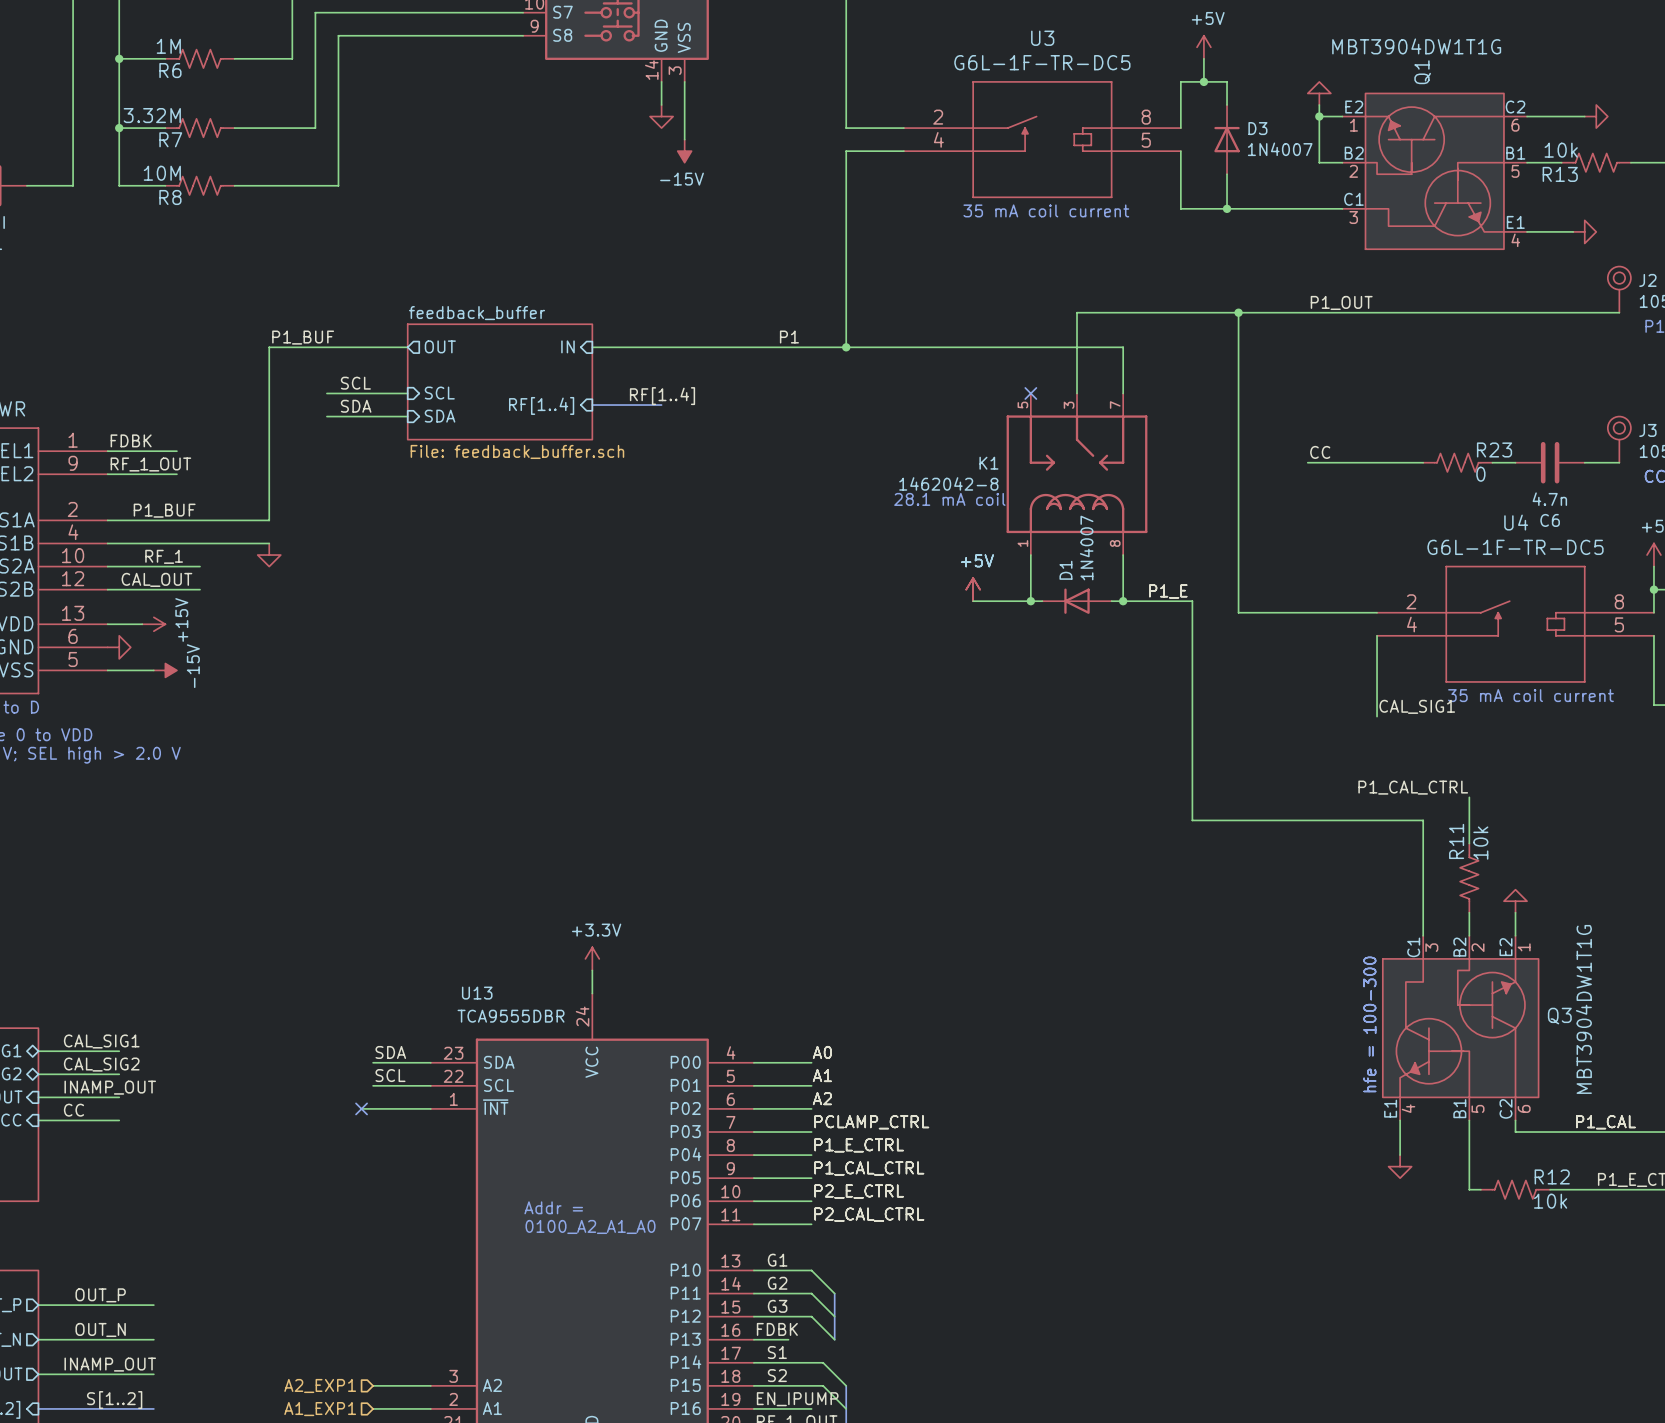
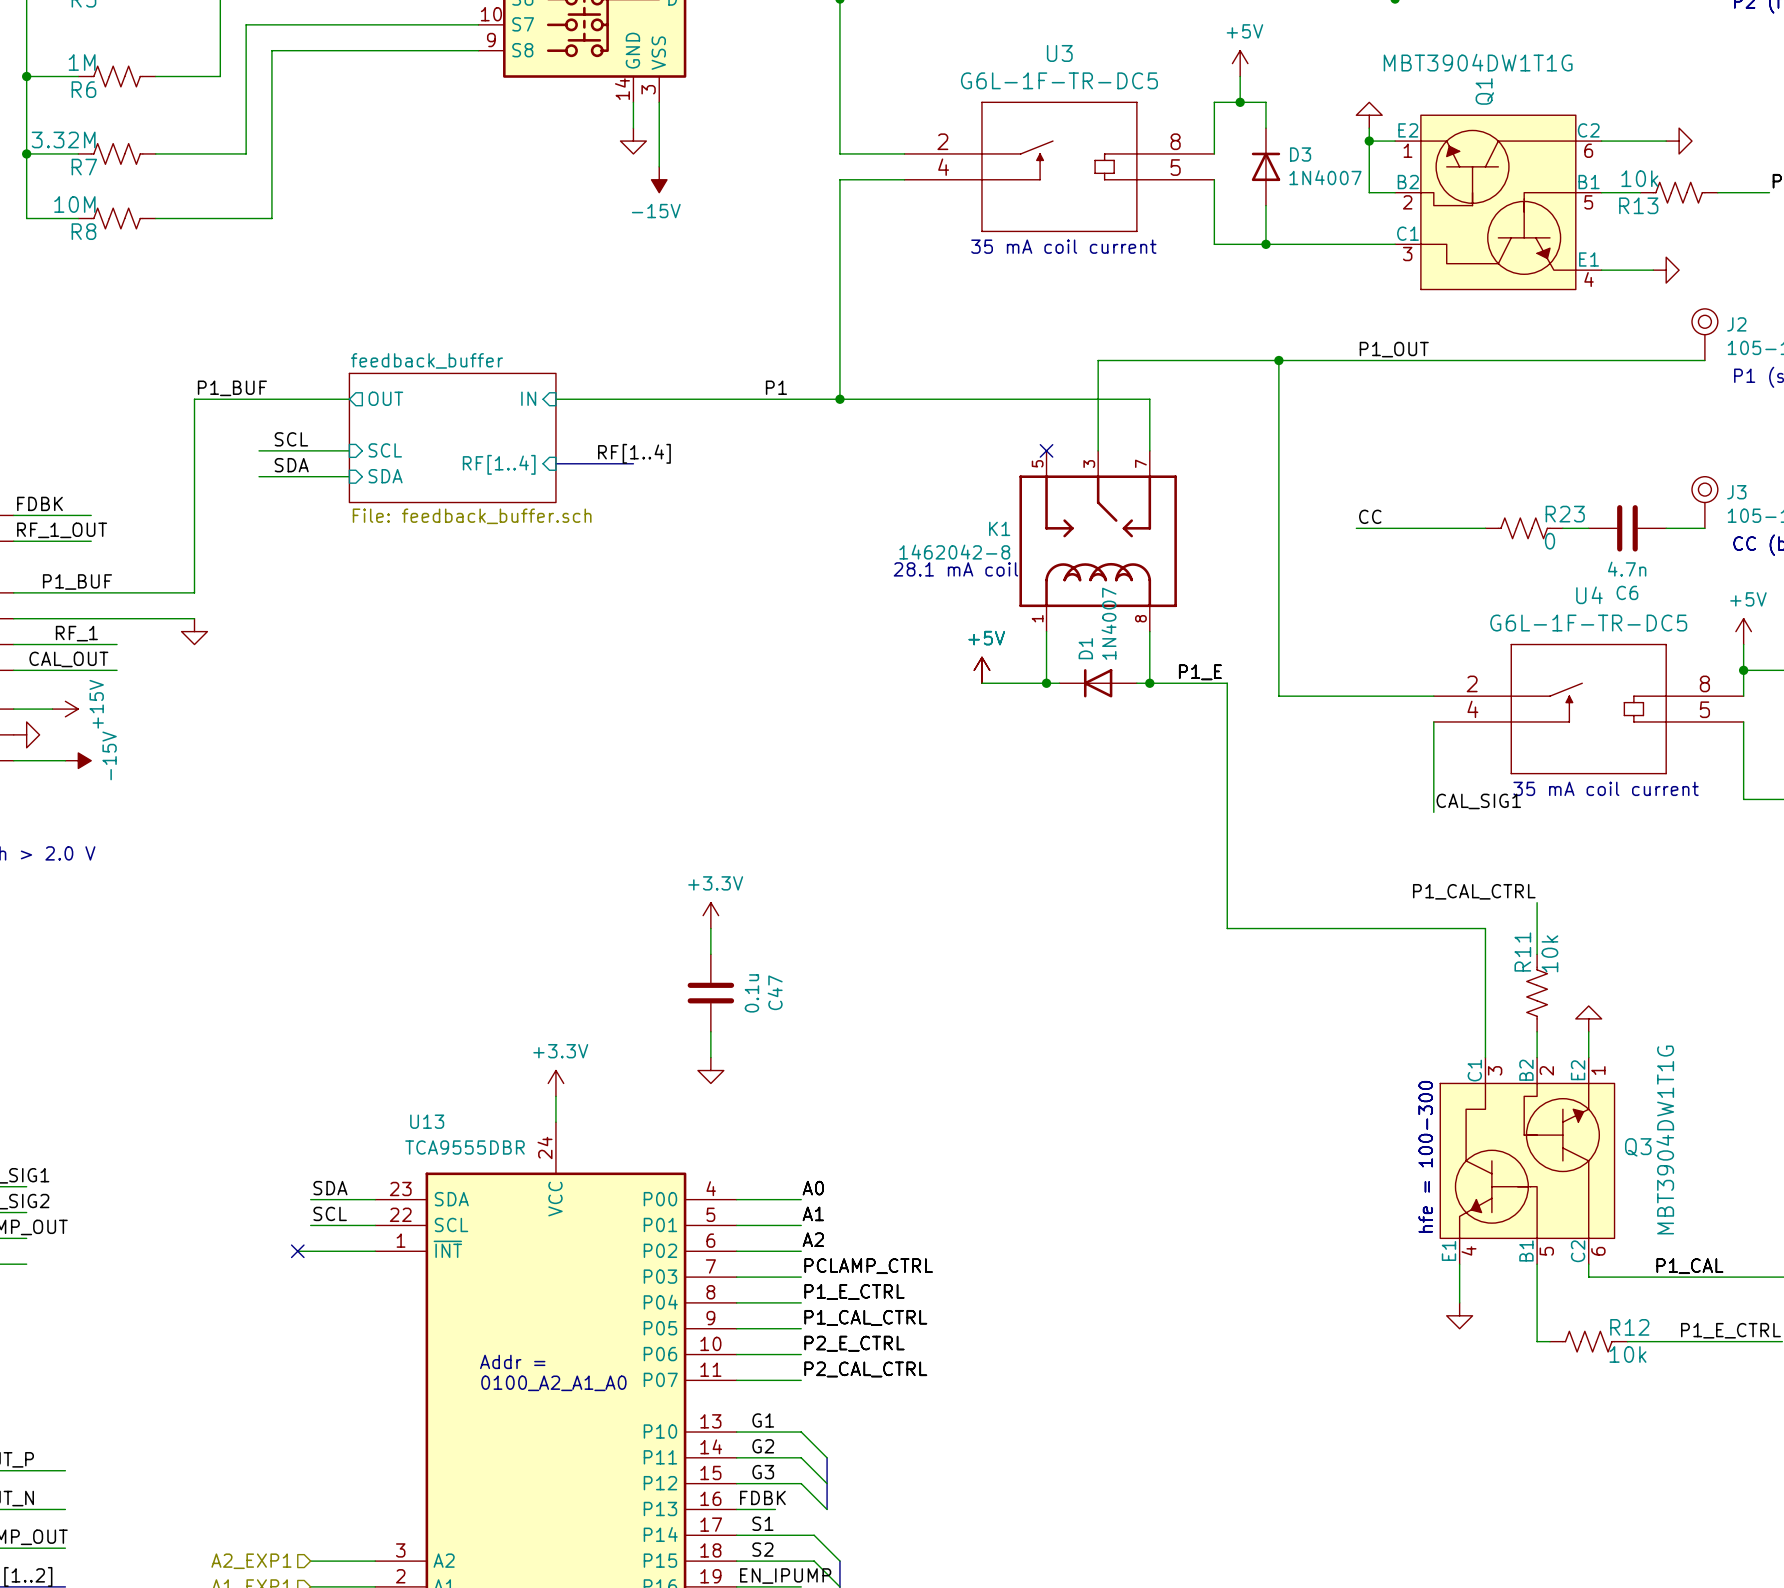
power symbol: none -> +3.3V (710, 915)
wire: none -> (710, 928) (710, 954)
C47: none -> 0.1u (710, 993)
wire: none -> (710, 1031) (710, 1057)
power symbol: none -> (710, 1070)

